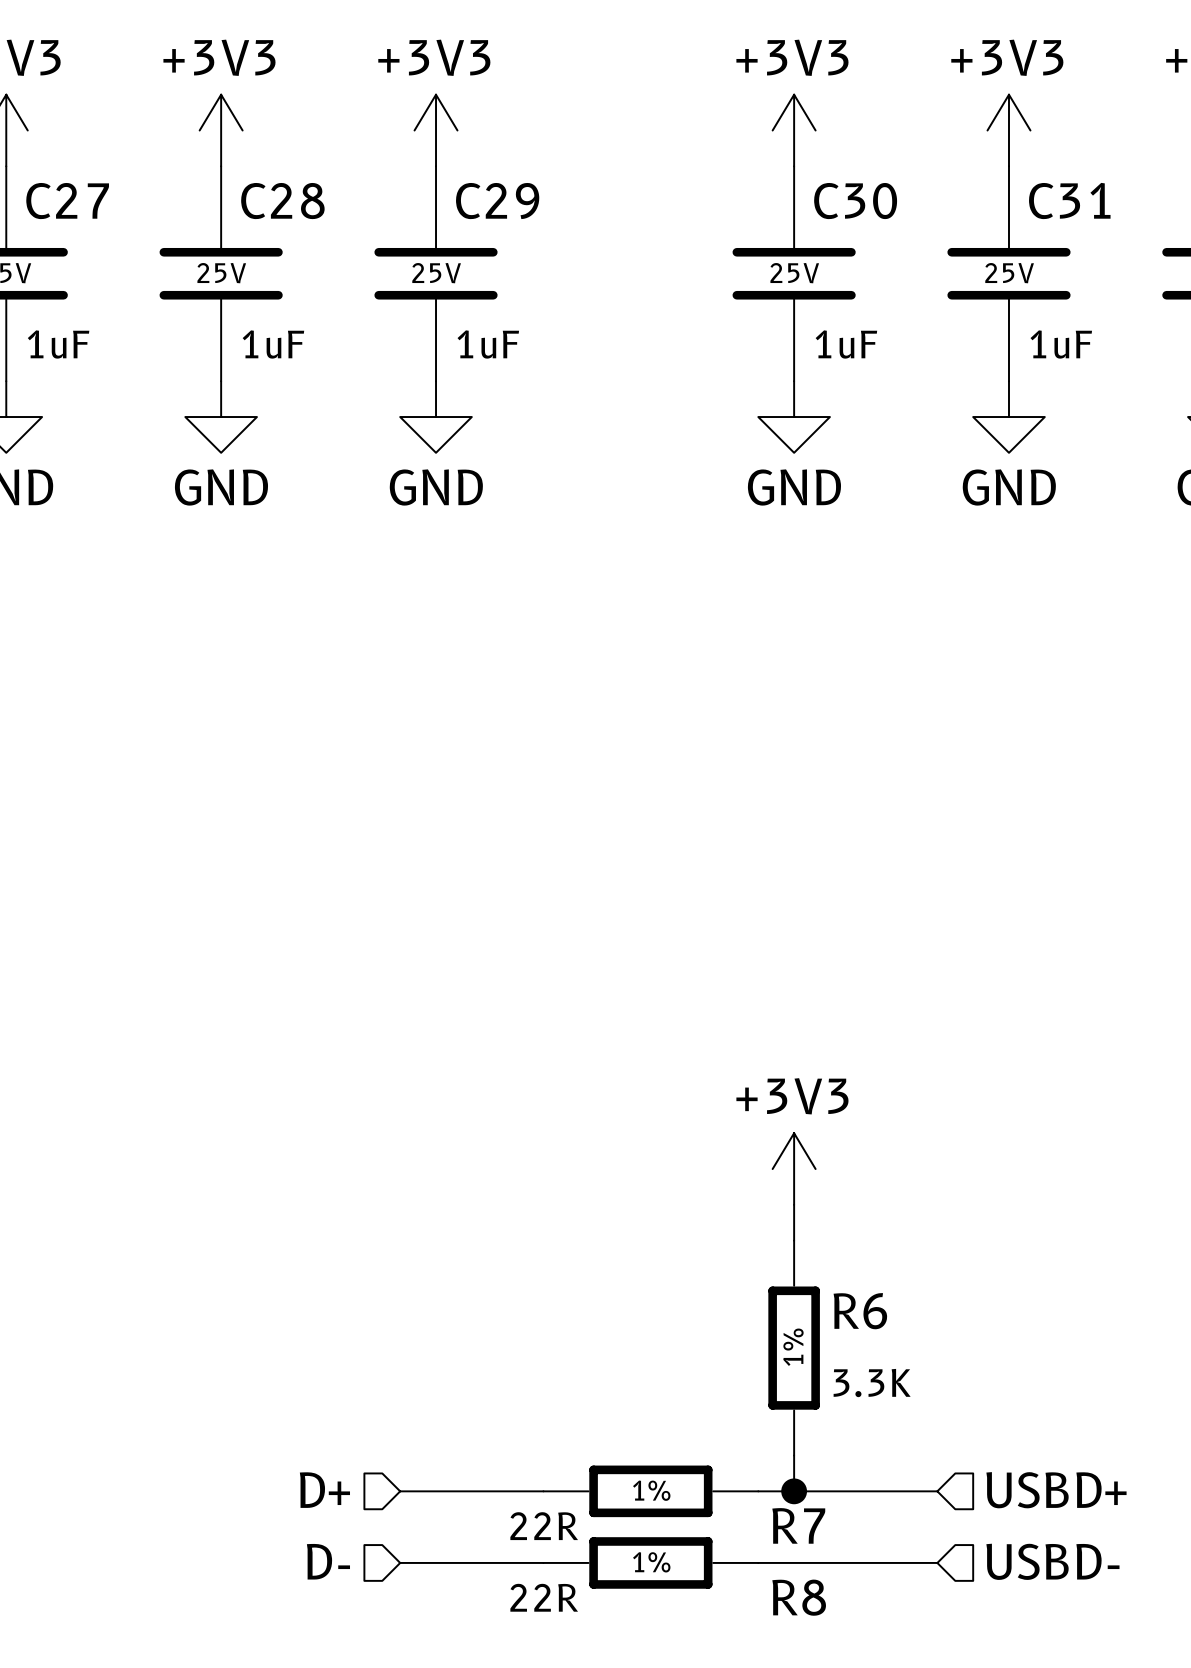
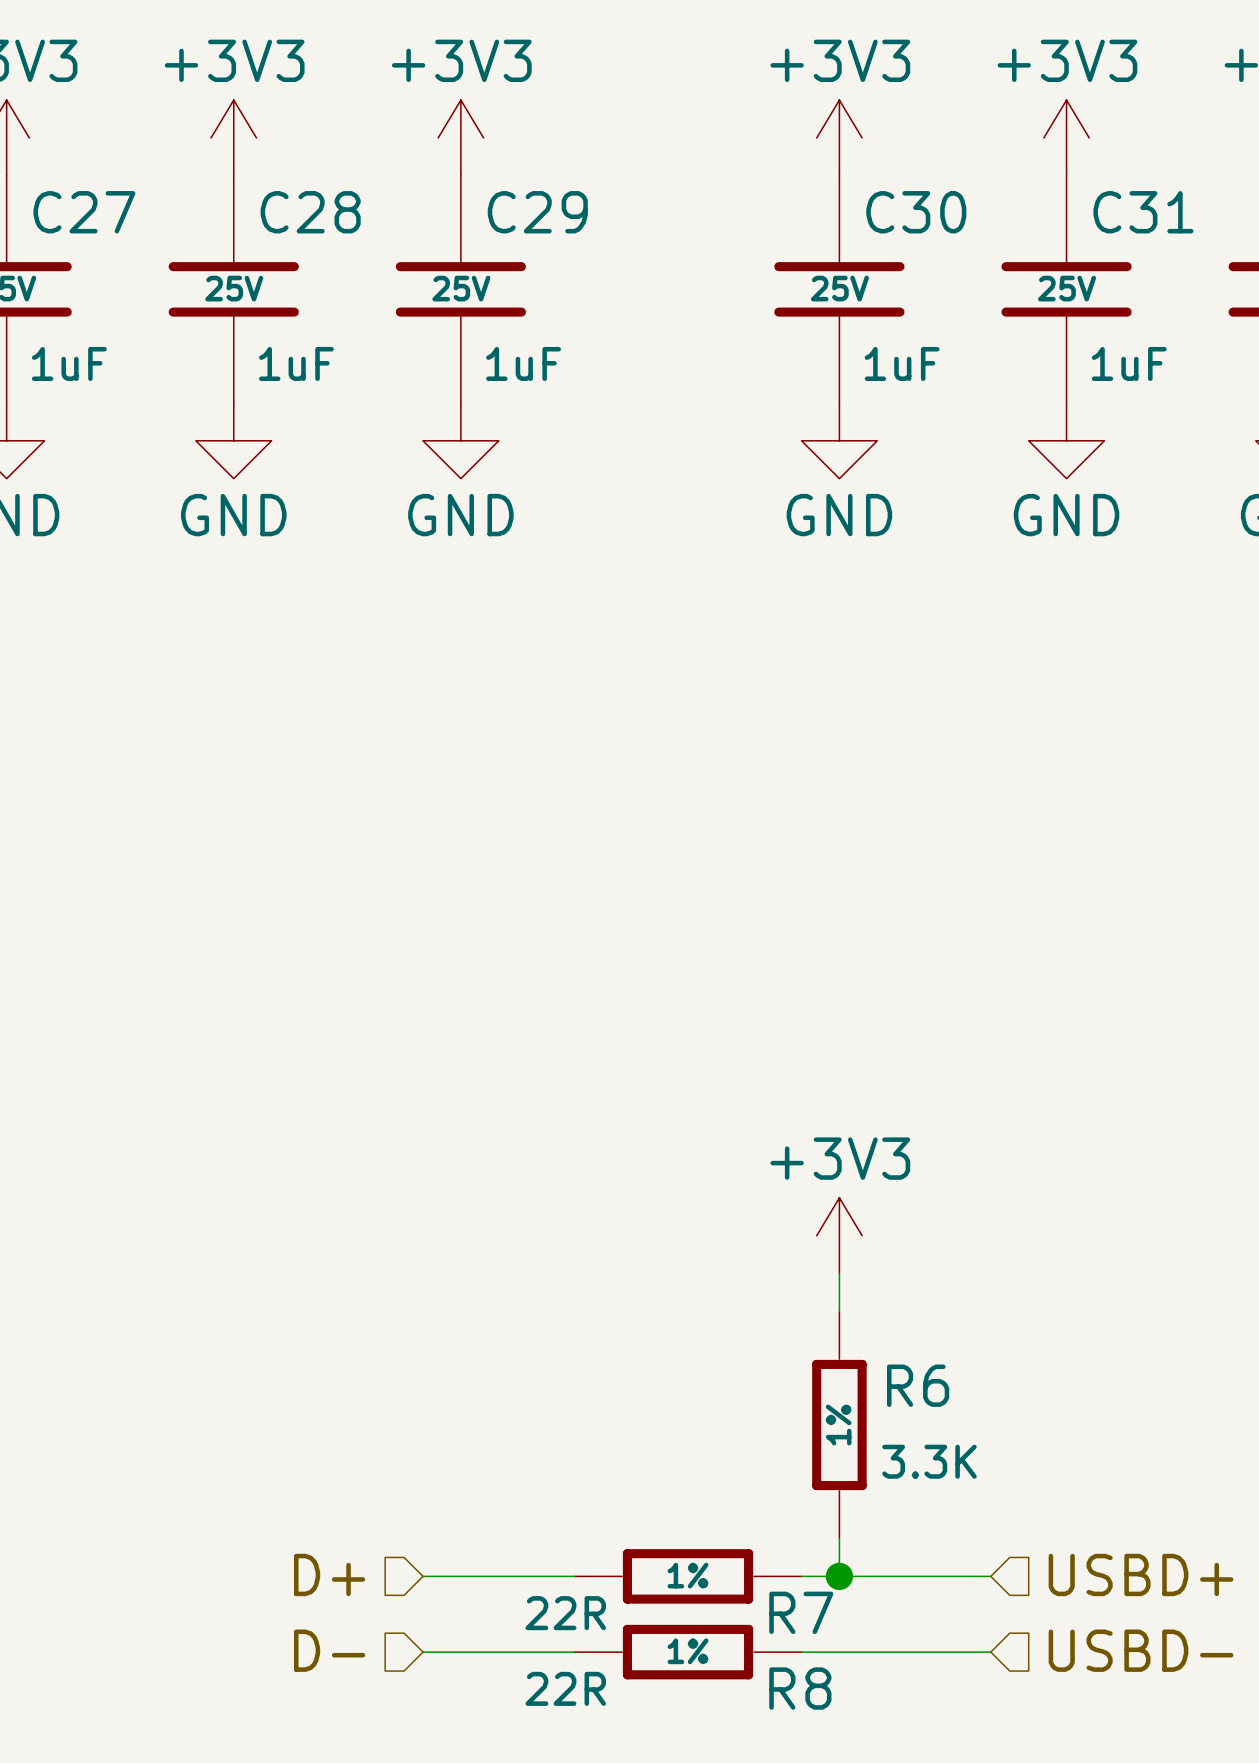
R7 name position: R7 (798, 1525) -> R7 (801, 1612)
R8 name position: R8 (799, 1597) -> R8 (800, 1688)

